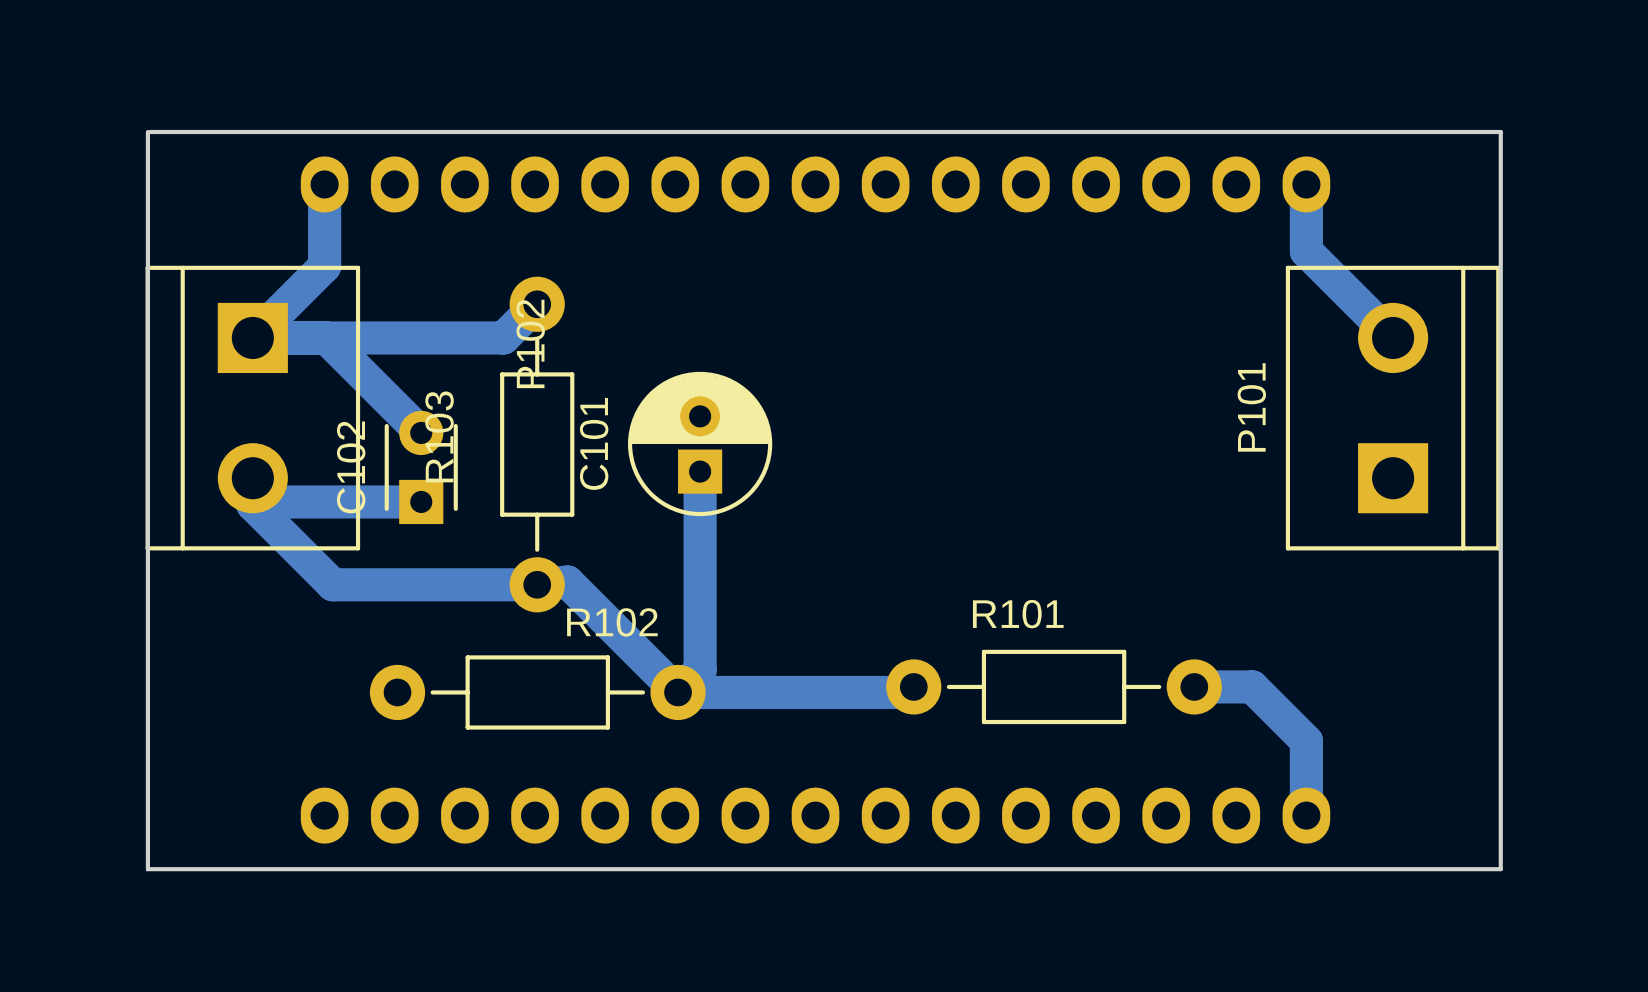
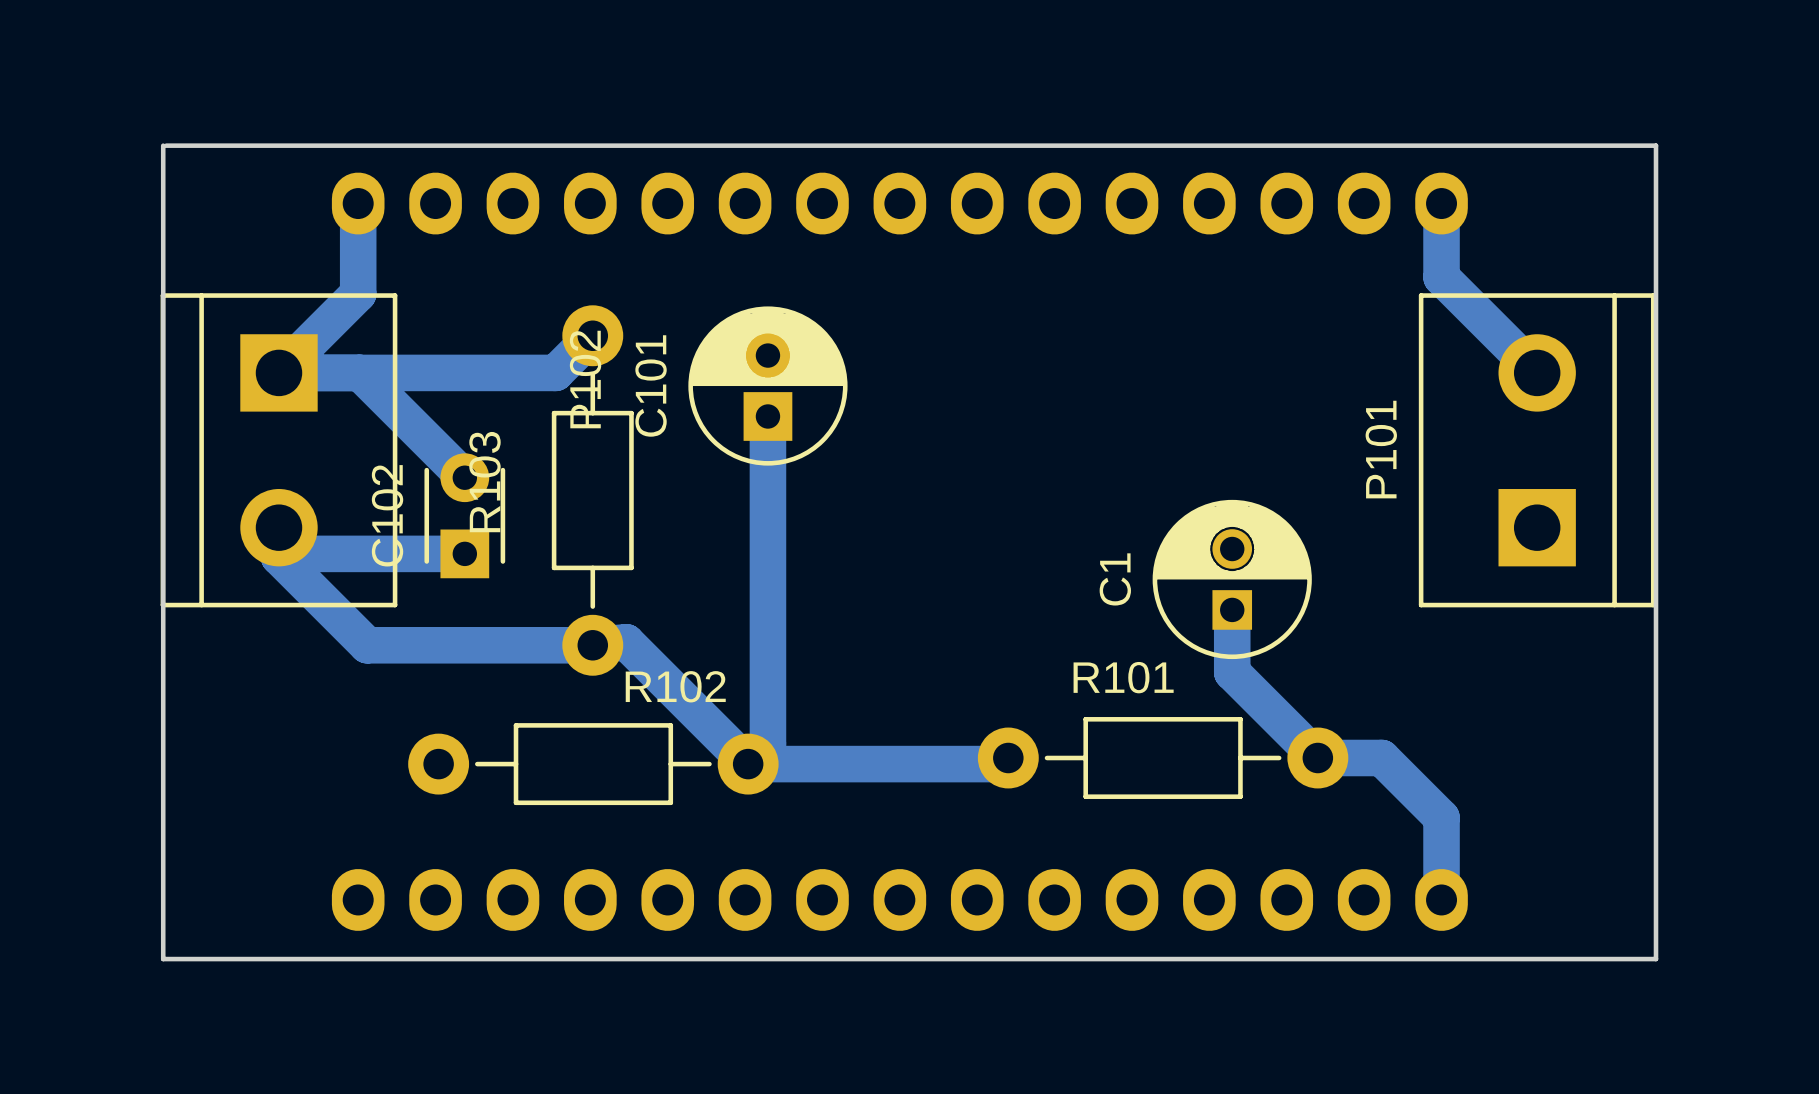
C101 position: (700, 443) -> (767, 386)
bottom track: (700, 471) (700, 670) (695, 674) -> (767, 416) (767, 744)
C1: none -> (1232, 579)
bottom track: none -> (1232, 609) (1232, 672) (1317, 758)

